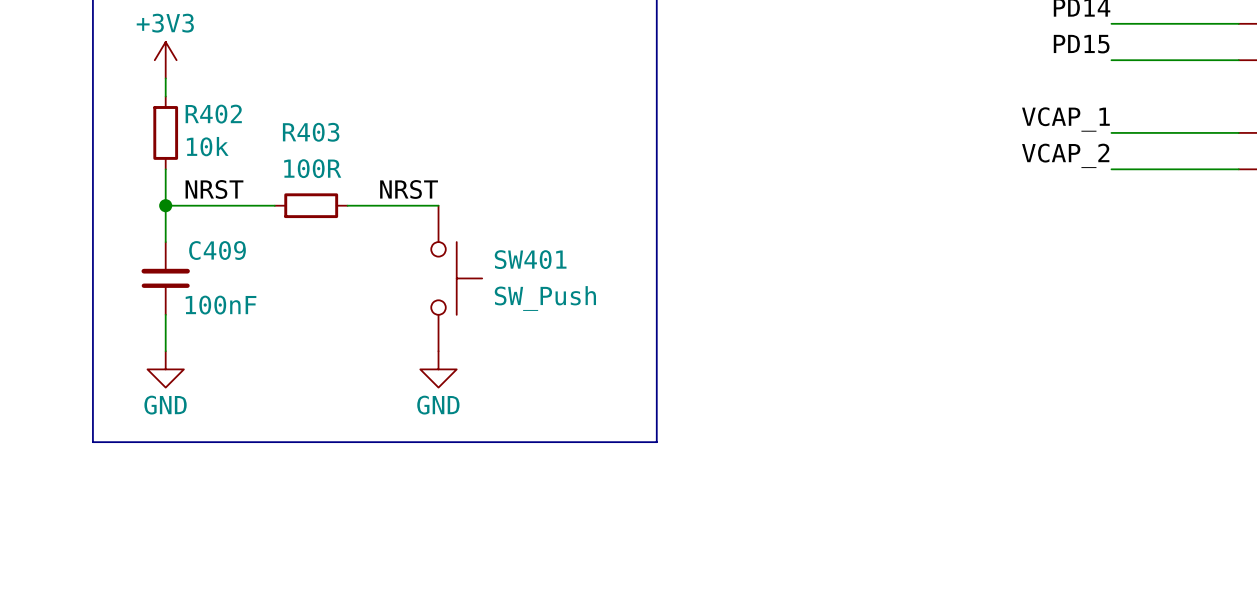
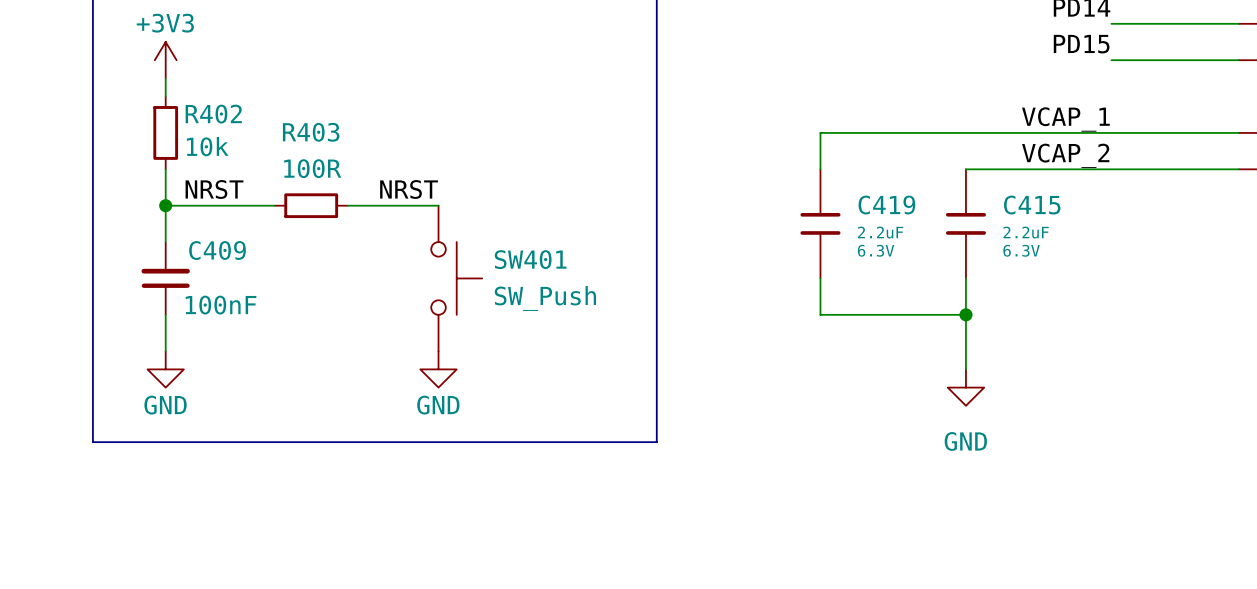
wire: none -> (1111, 132) (820, 132) (820, 169)
wire: none -> (965, 169) (1111, 169)
C419: none -> 2.2uF (820, 223)
C415: none -> 2.2uF (965, 223)
wire: none -> (820, 278) (820, 314) (965, 314)
wire: none -> (965, 278) (965, 369)
junction: none -> (965, 314)
power symbol: none -> GND (965, 387)

